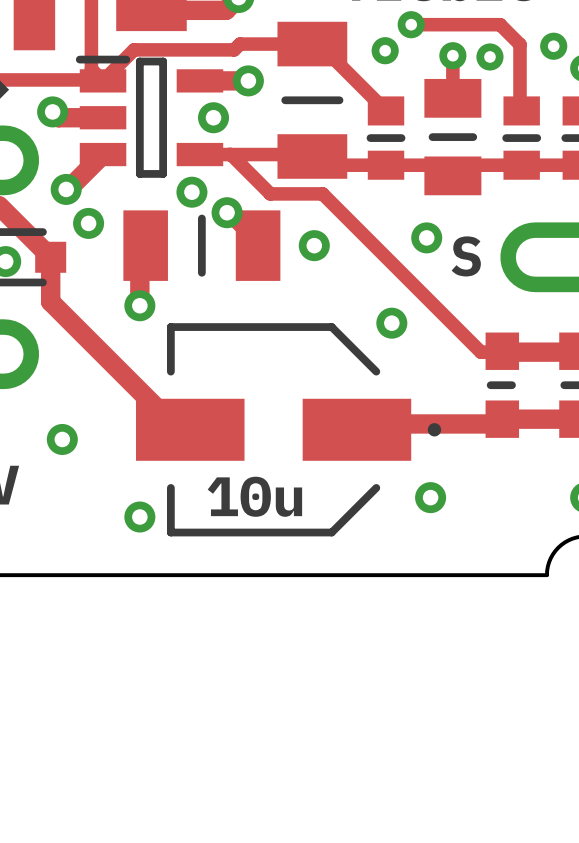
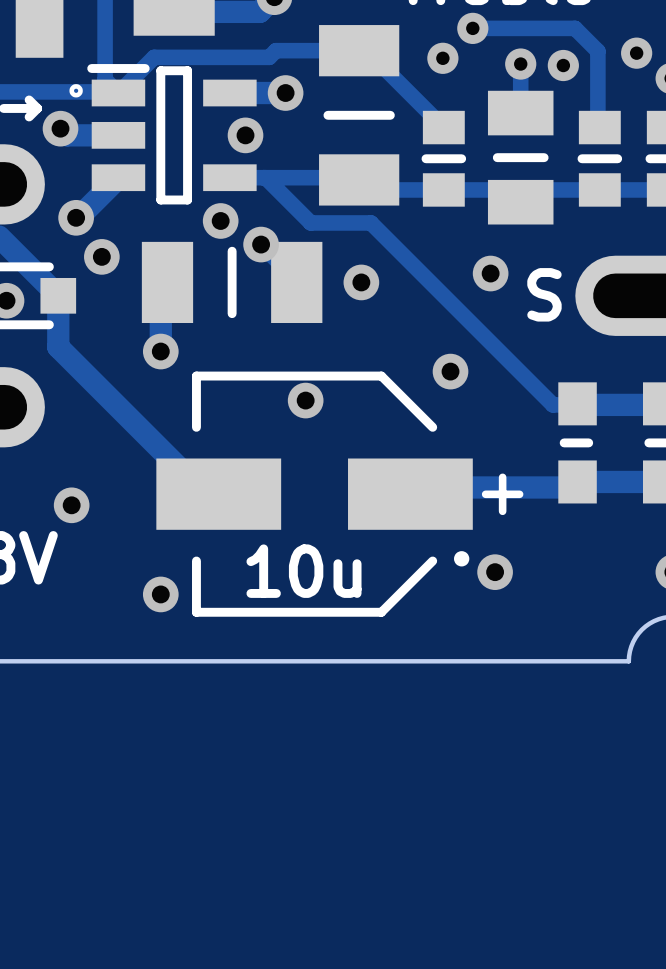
part footprint: [75, 55, 224, 178] -> [69, 64, 257, 205]
part footprint: [135, 323, 442, 537] -> [156, 371, 473, 617]
via: none -> (305, 400)

